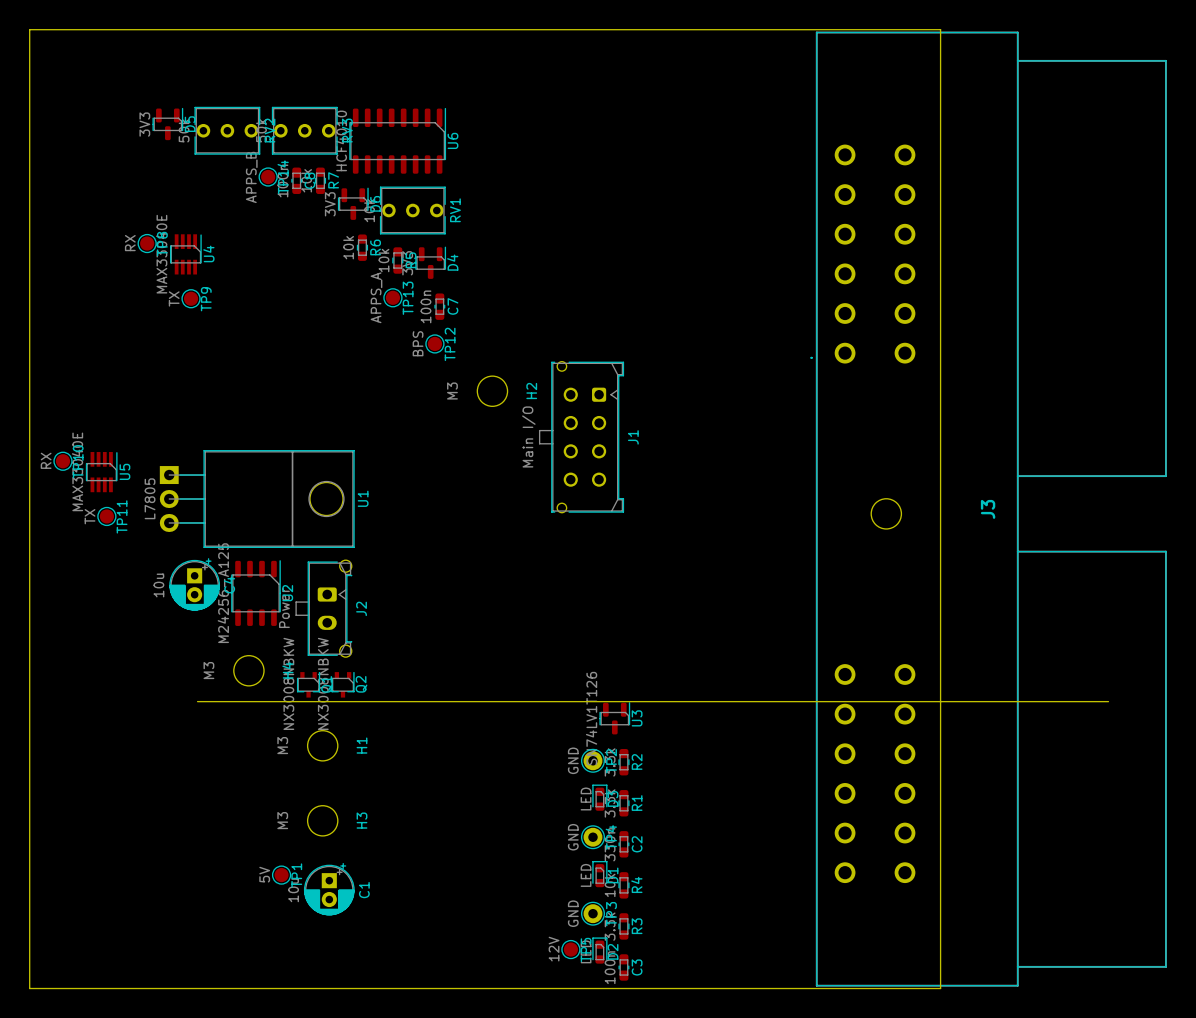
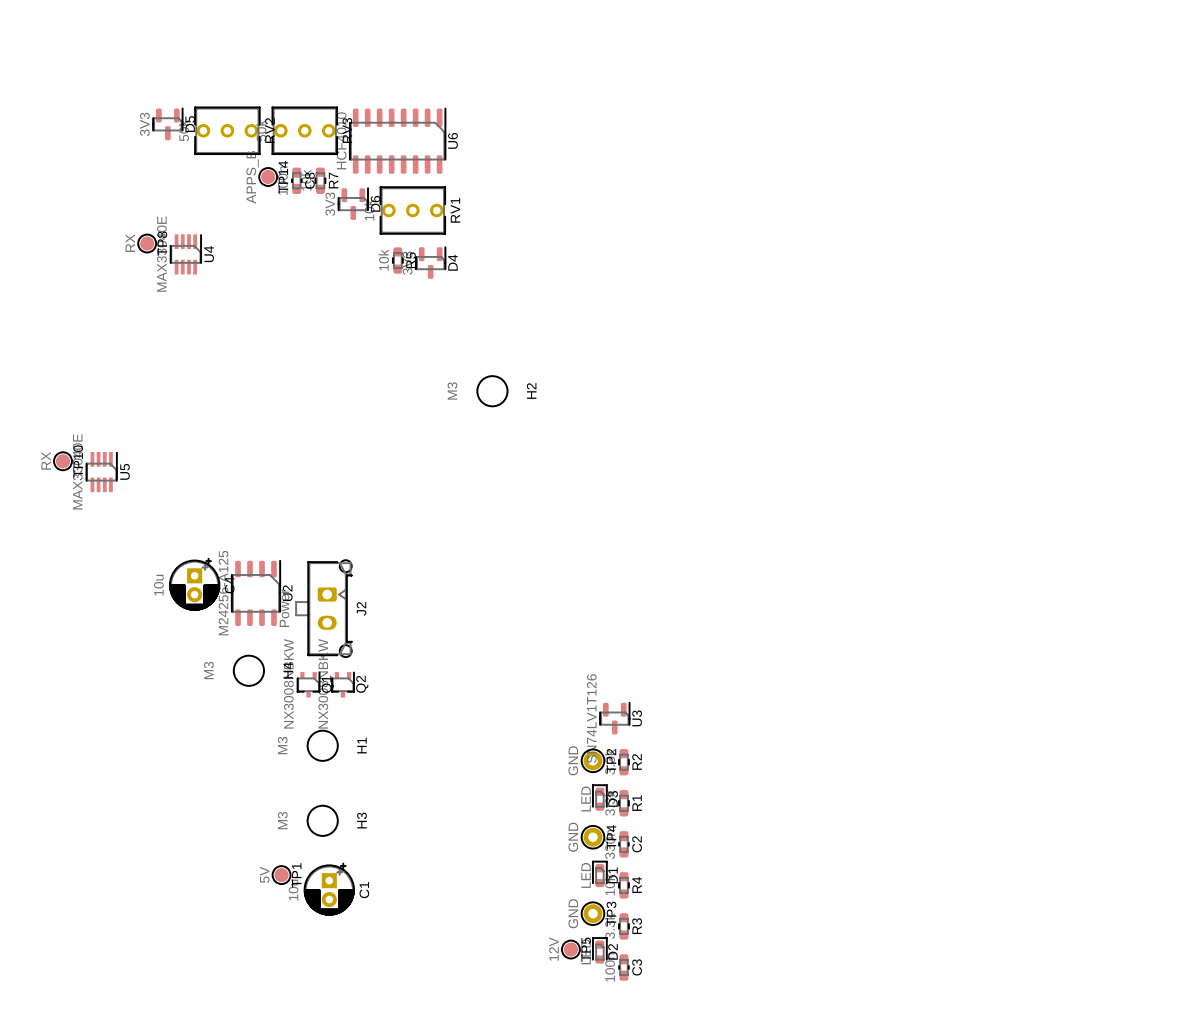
board edge: (29, 29) (940, 29) (940, 988) (29, 988) (29, 29) -> none
R6: 10k (362, 247) -> none
TP13: APPS_A (392, 297) -> none
TP9: TX (191, 298) -> none
C7: 100n (439, 306) -> none
TP12: BPS (434, 343) -> none
J1: Main I/O (581, 437) -> none
U1: L7805 (257, 499) -> none
J3: (988, 509) -> none
TP11: TX (106, 516) -> none
board edge: (197, 701) (1108, 701) -> none

